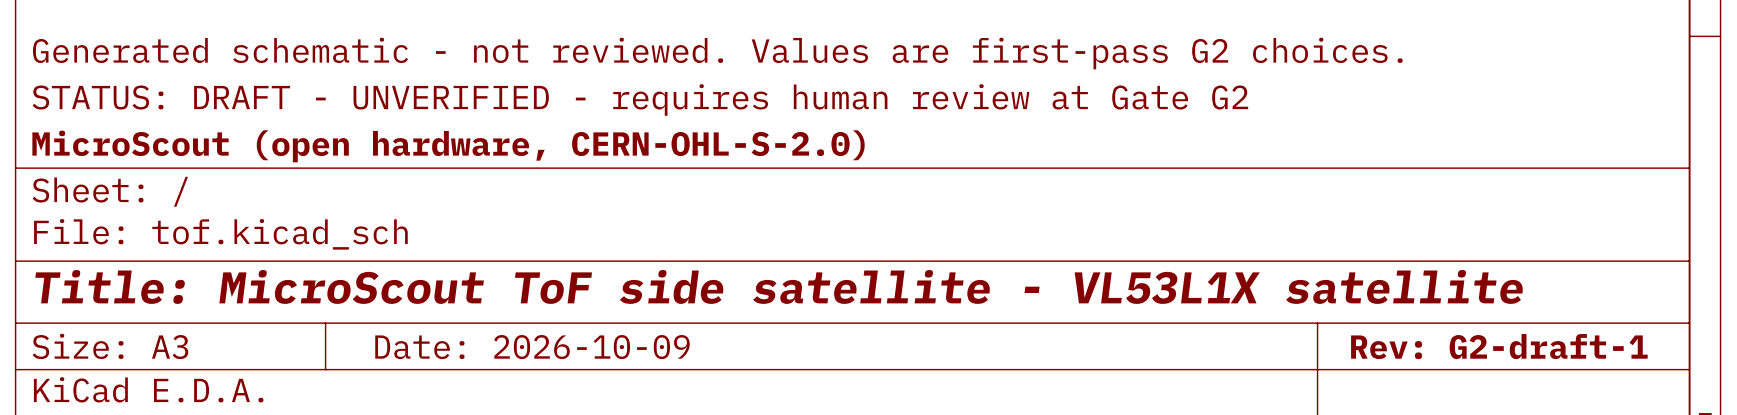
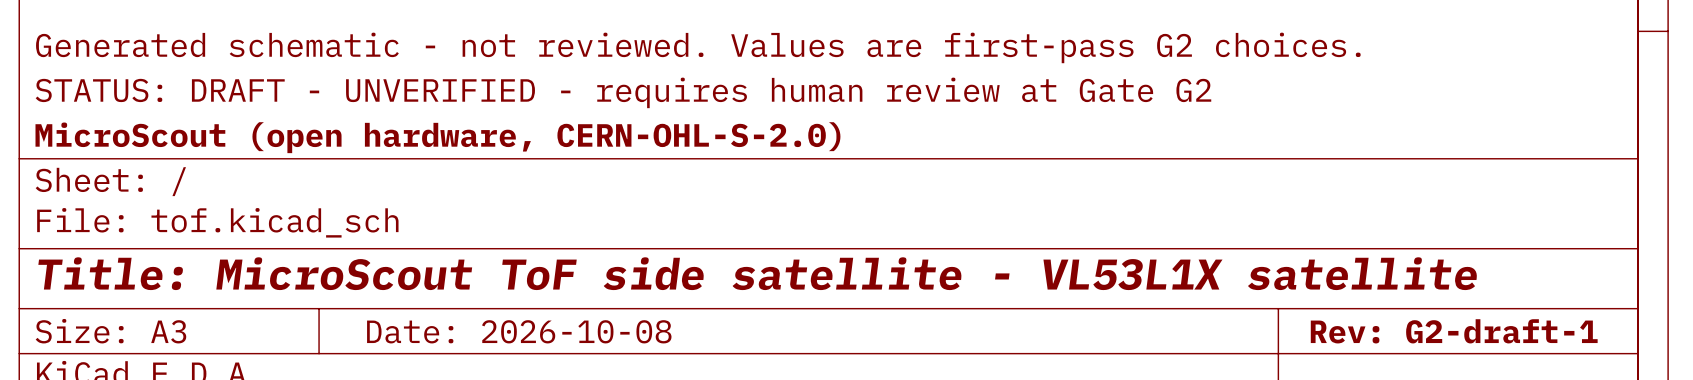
title block: Date: 2026-10-09 (532, 347) -> Date: 2026-10-08 (519, 331)

